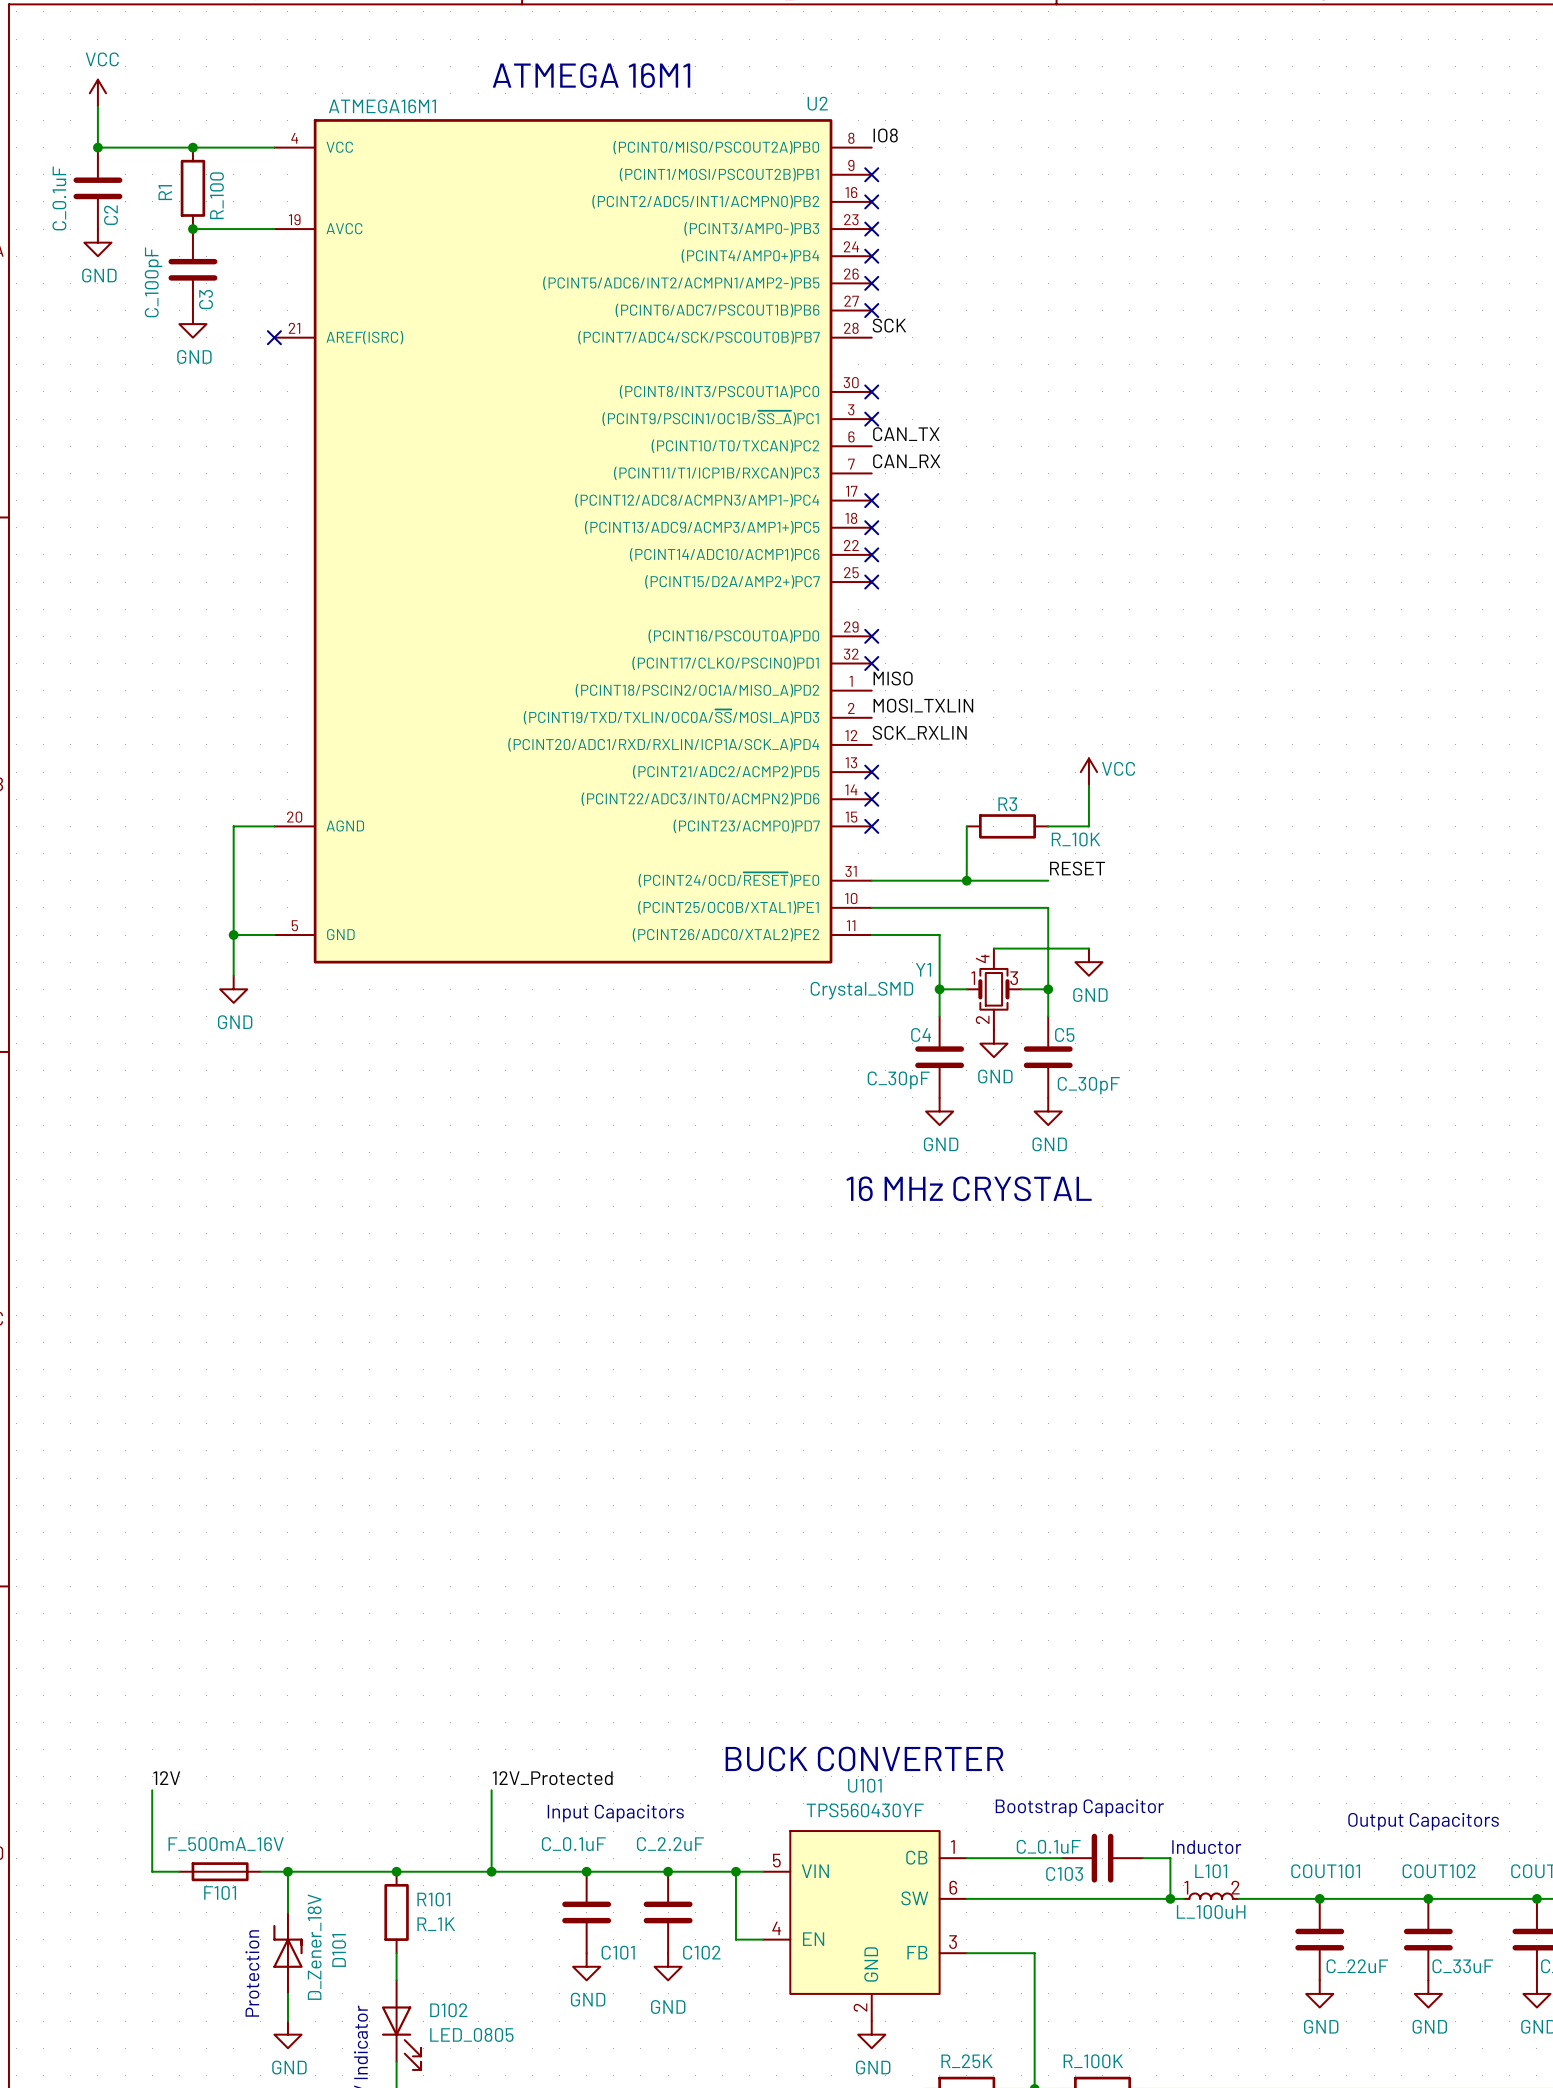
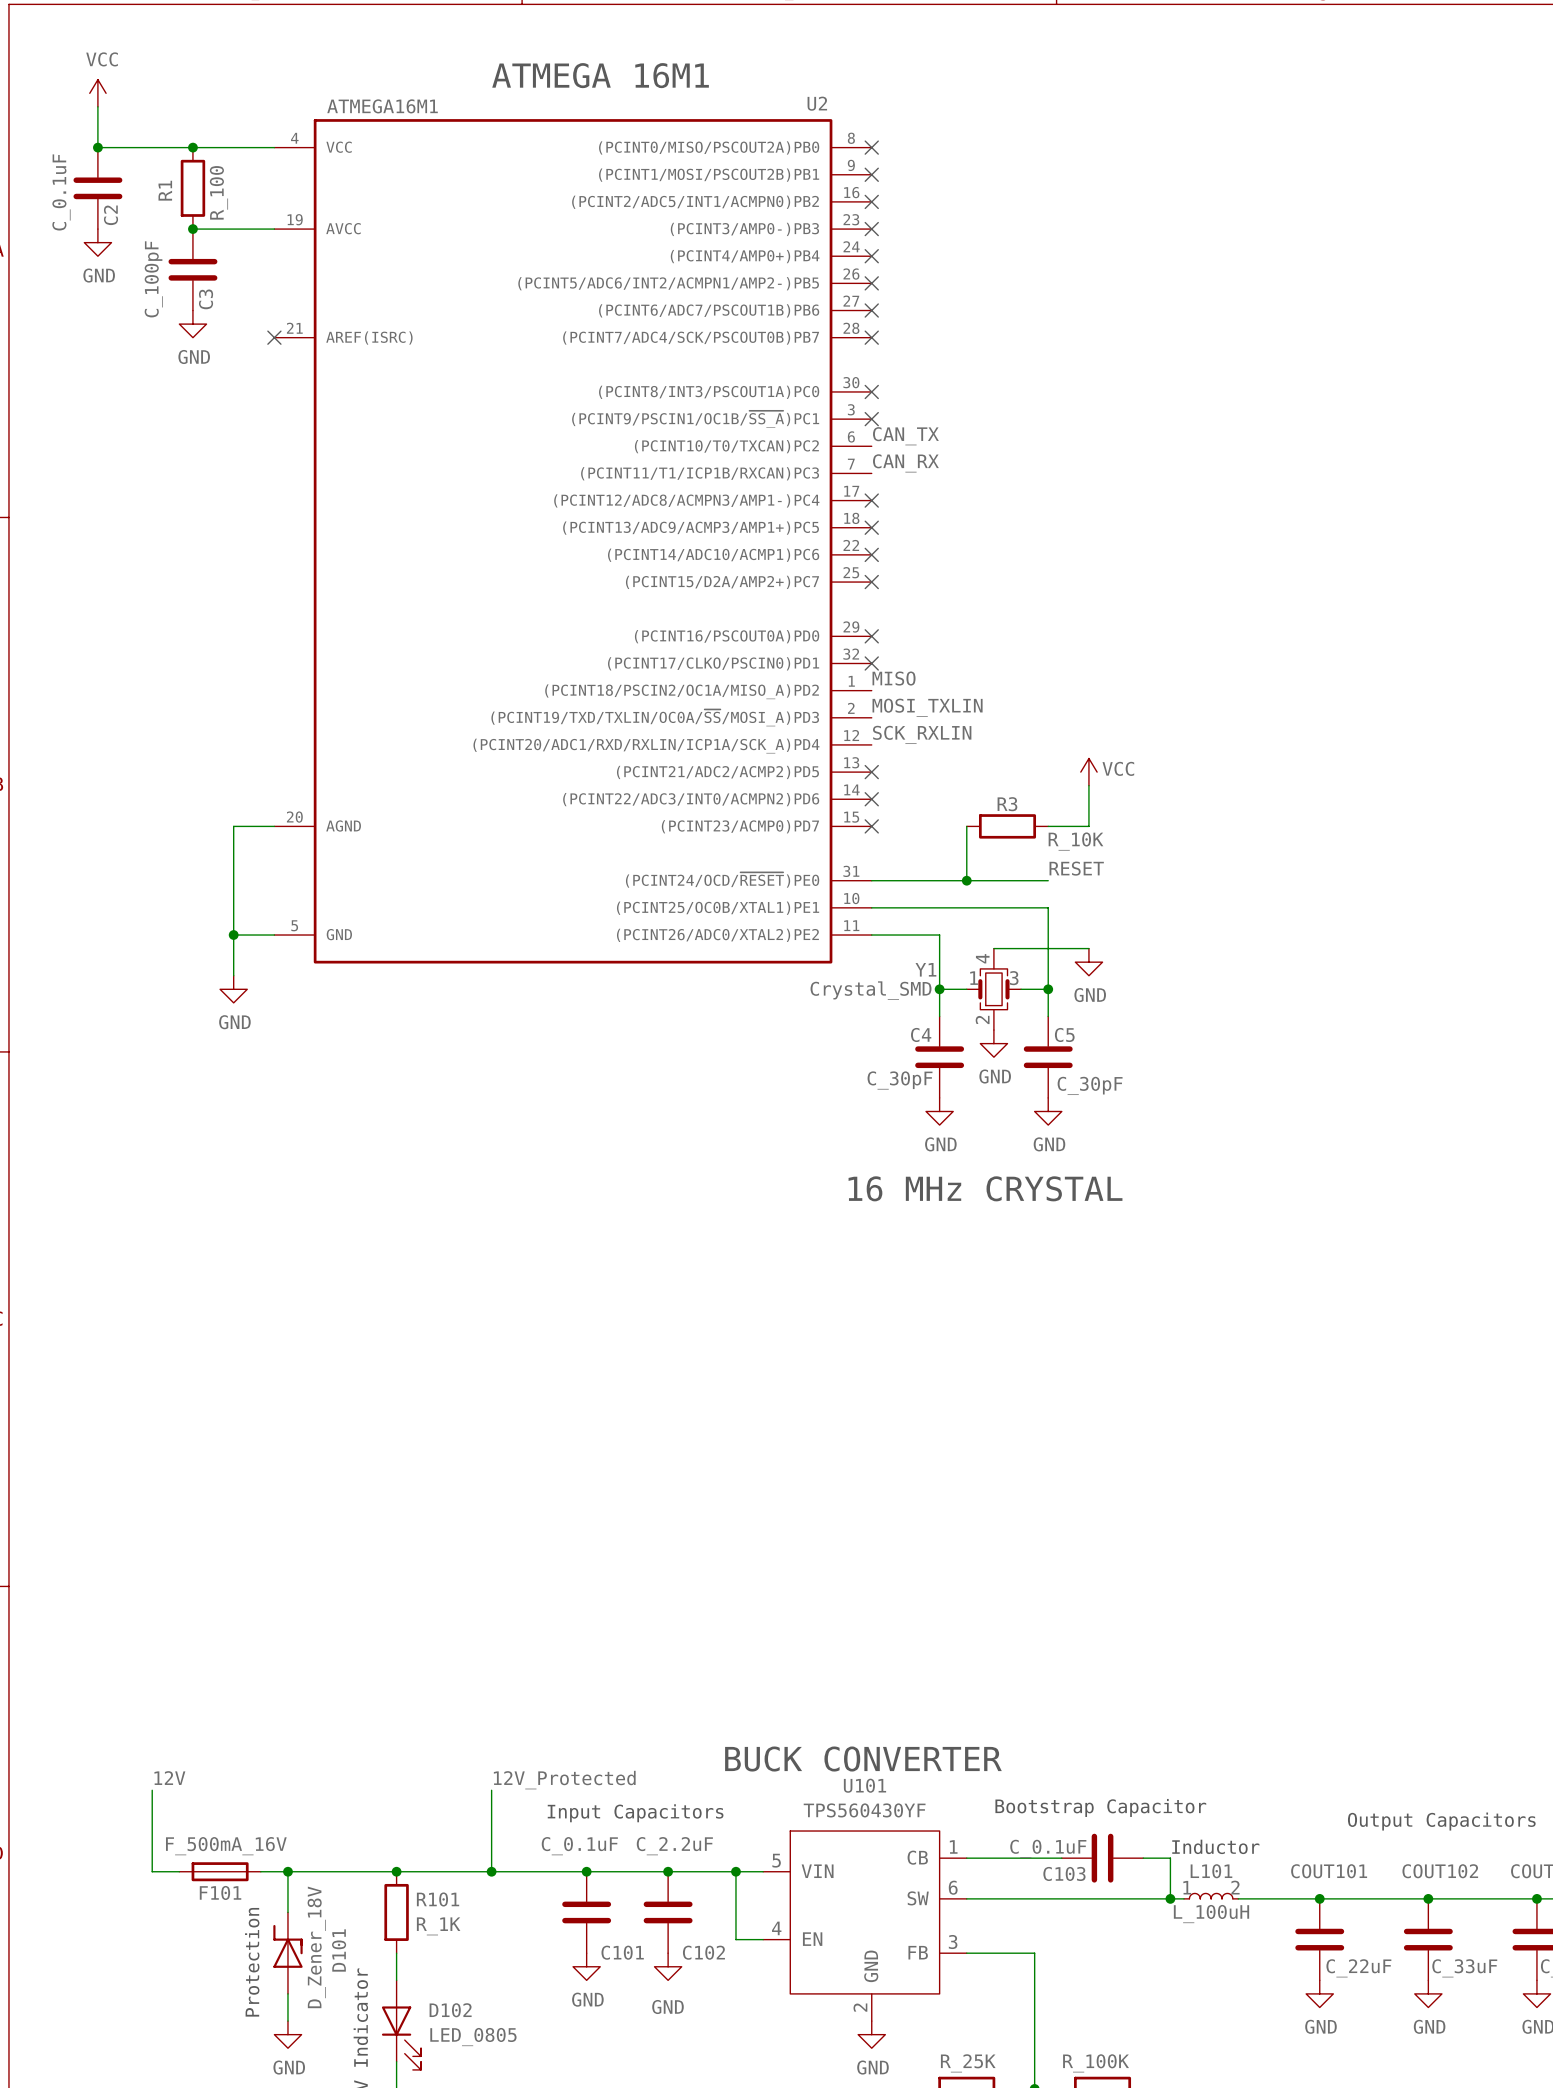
label: IO8 (885, 135) -> none
no-connect mark: none -> (871, 147)
label: SCK (889, 325) -> none
no-connect mark: none -> (871, 337)

